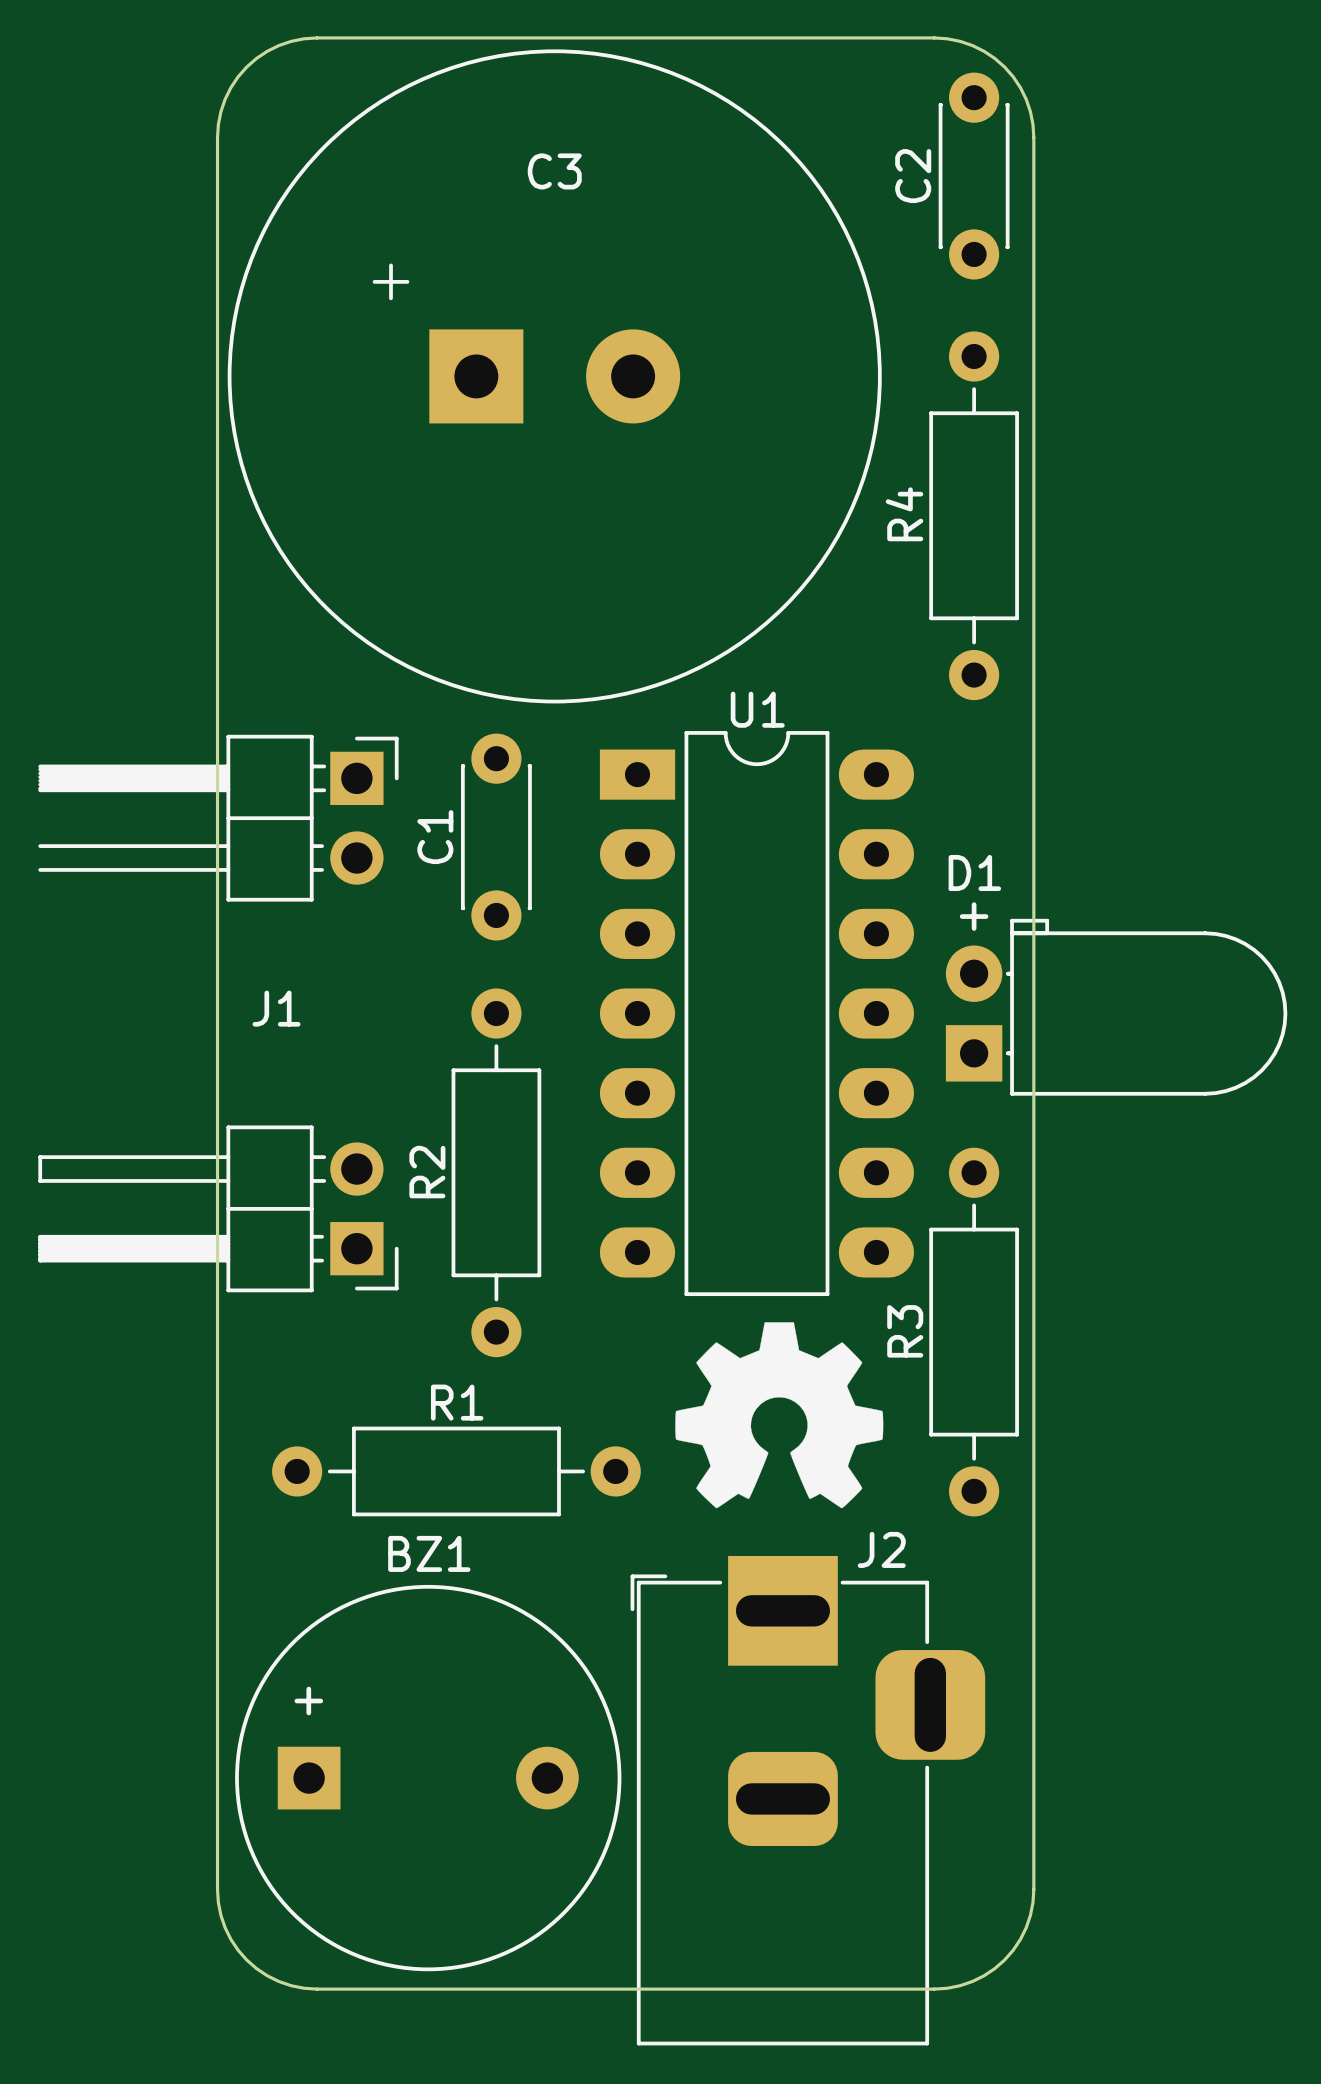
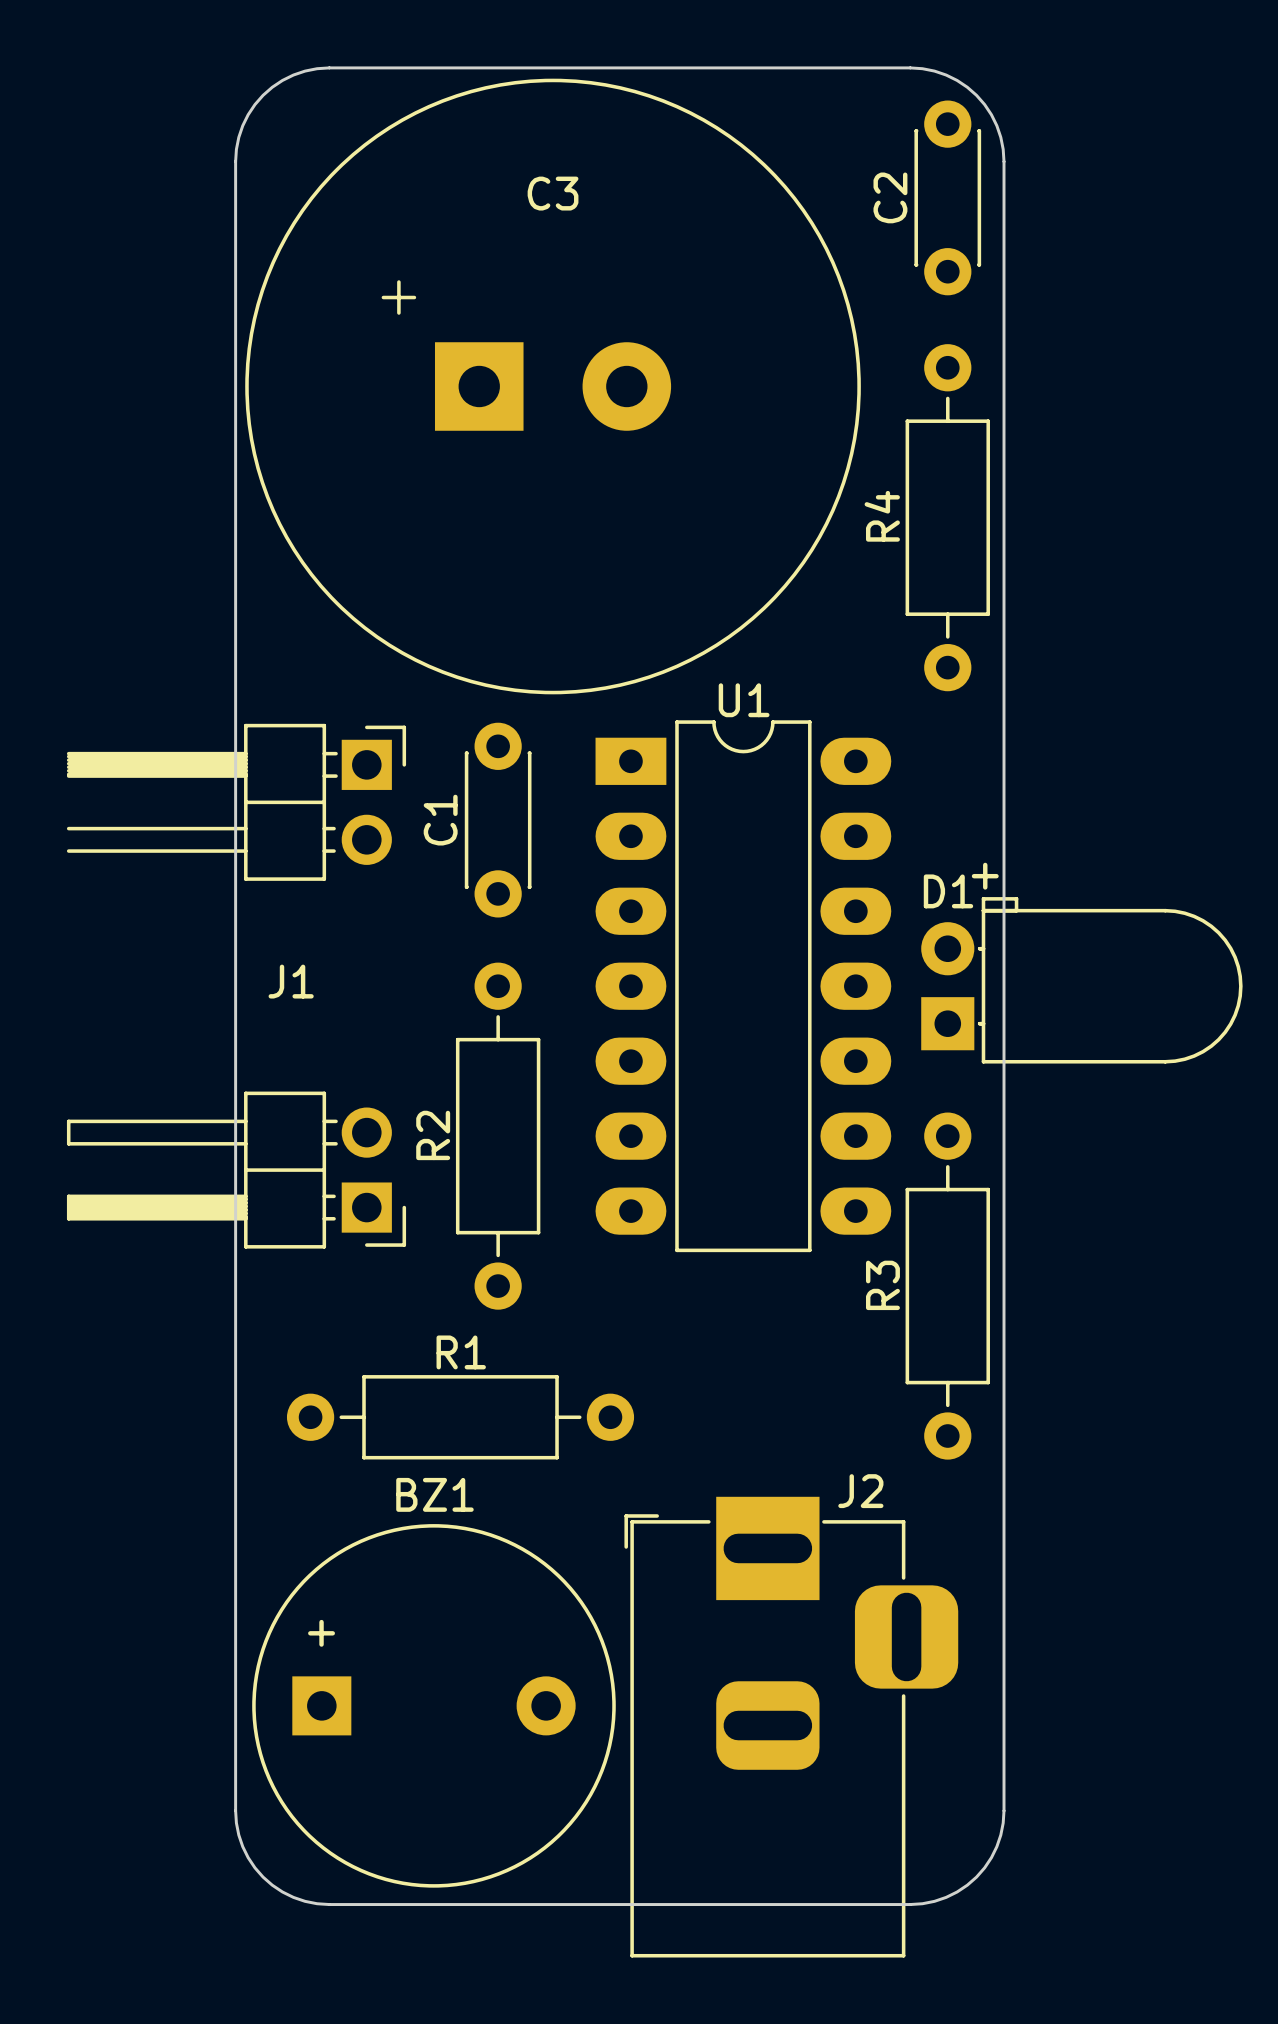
D1 name position: D1 (974, 872) -> D1 (948, 891)
text position: + (974, 916) -> + (985, 876)
drawing: [675, 1322, 884, 1509] -> none

